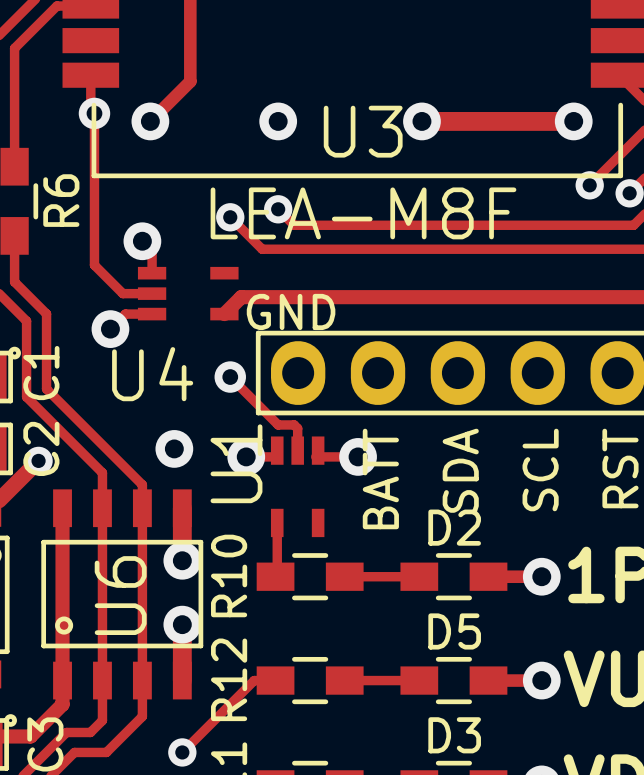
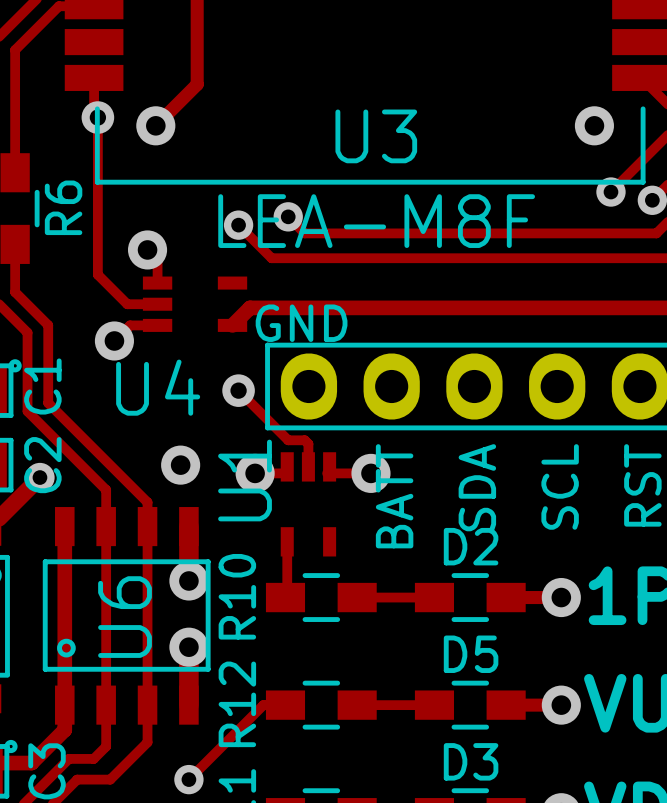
via: (278, 121) -> none
track: (421, 121) (573, 121) -> none
via: (421, 121) -> none

